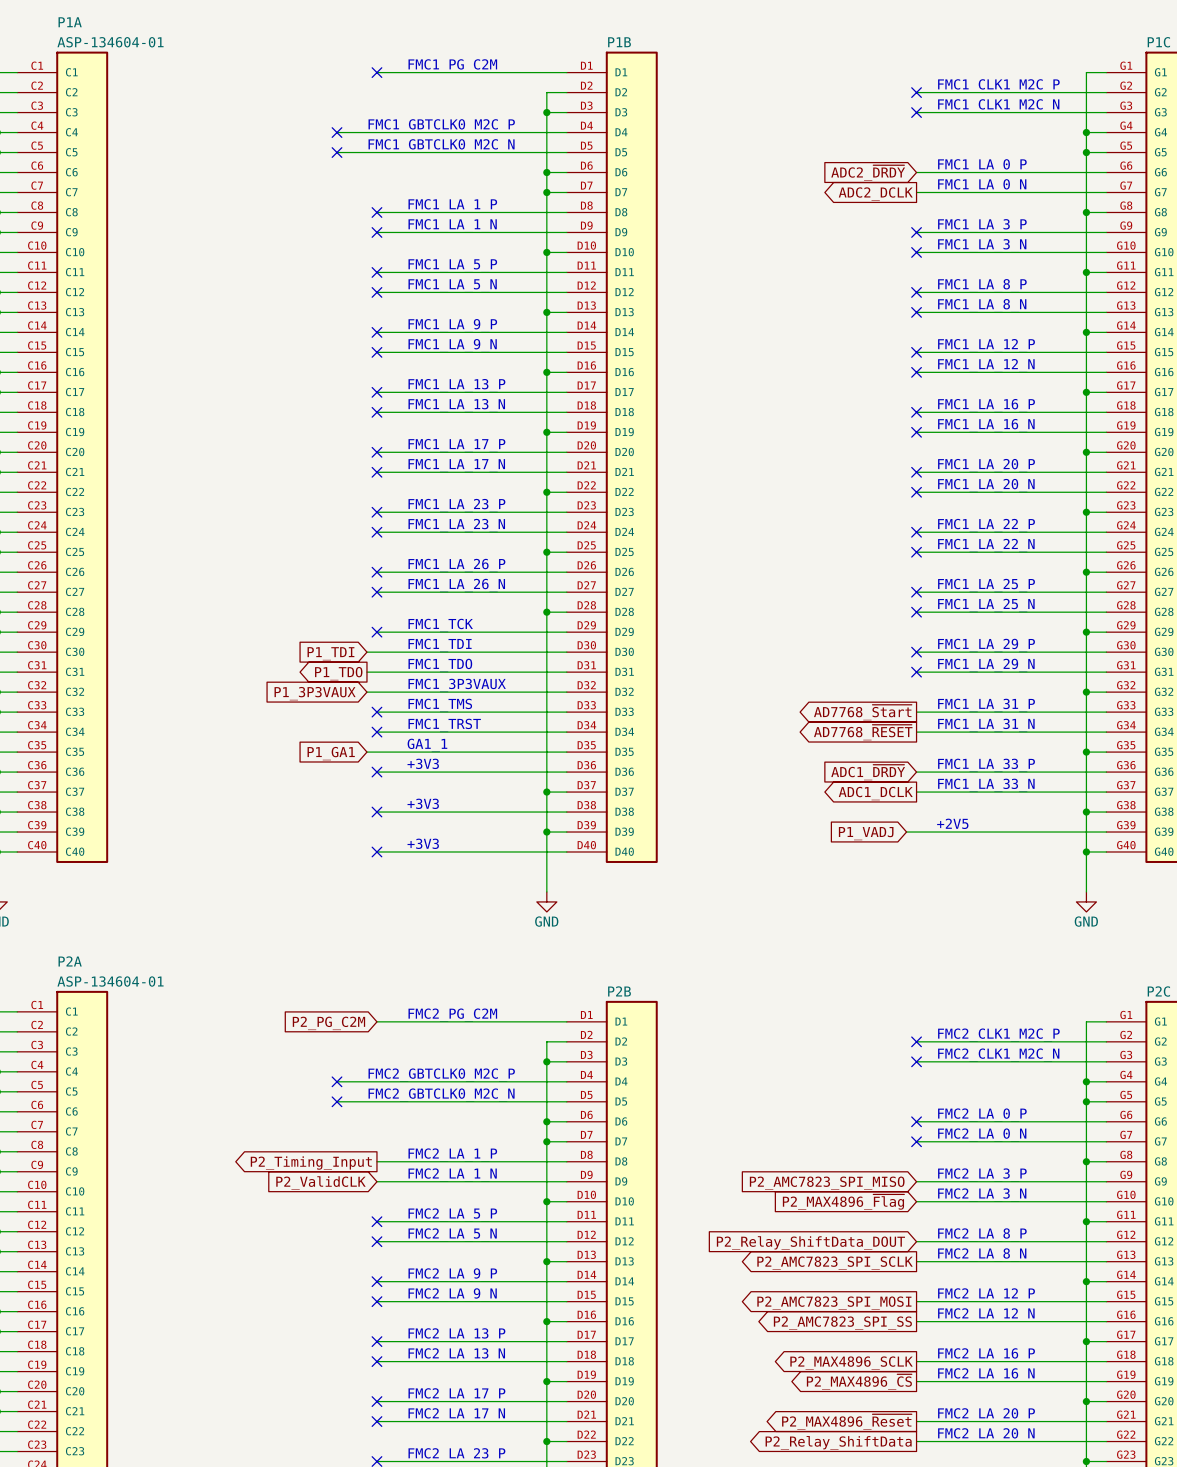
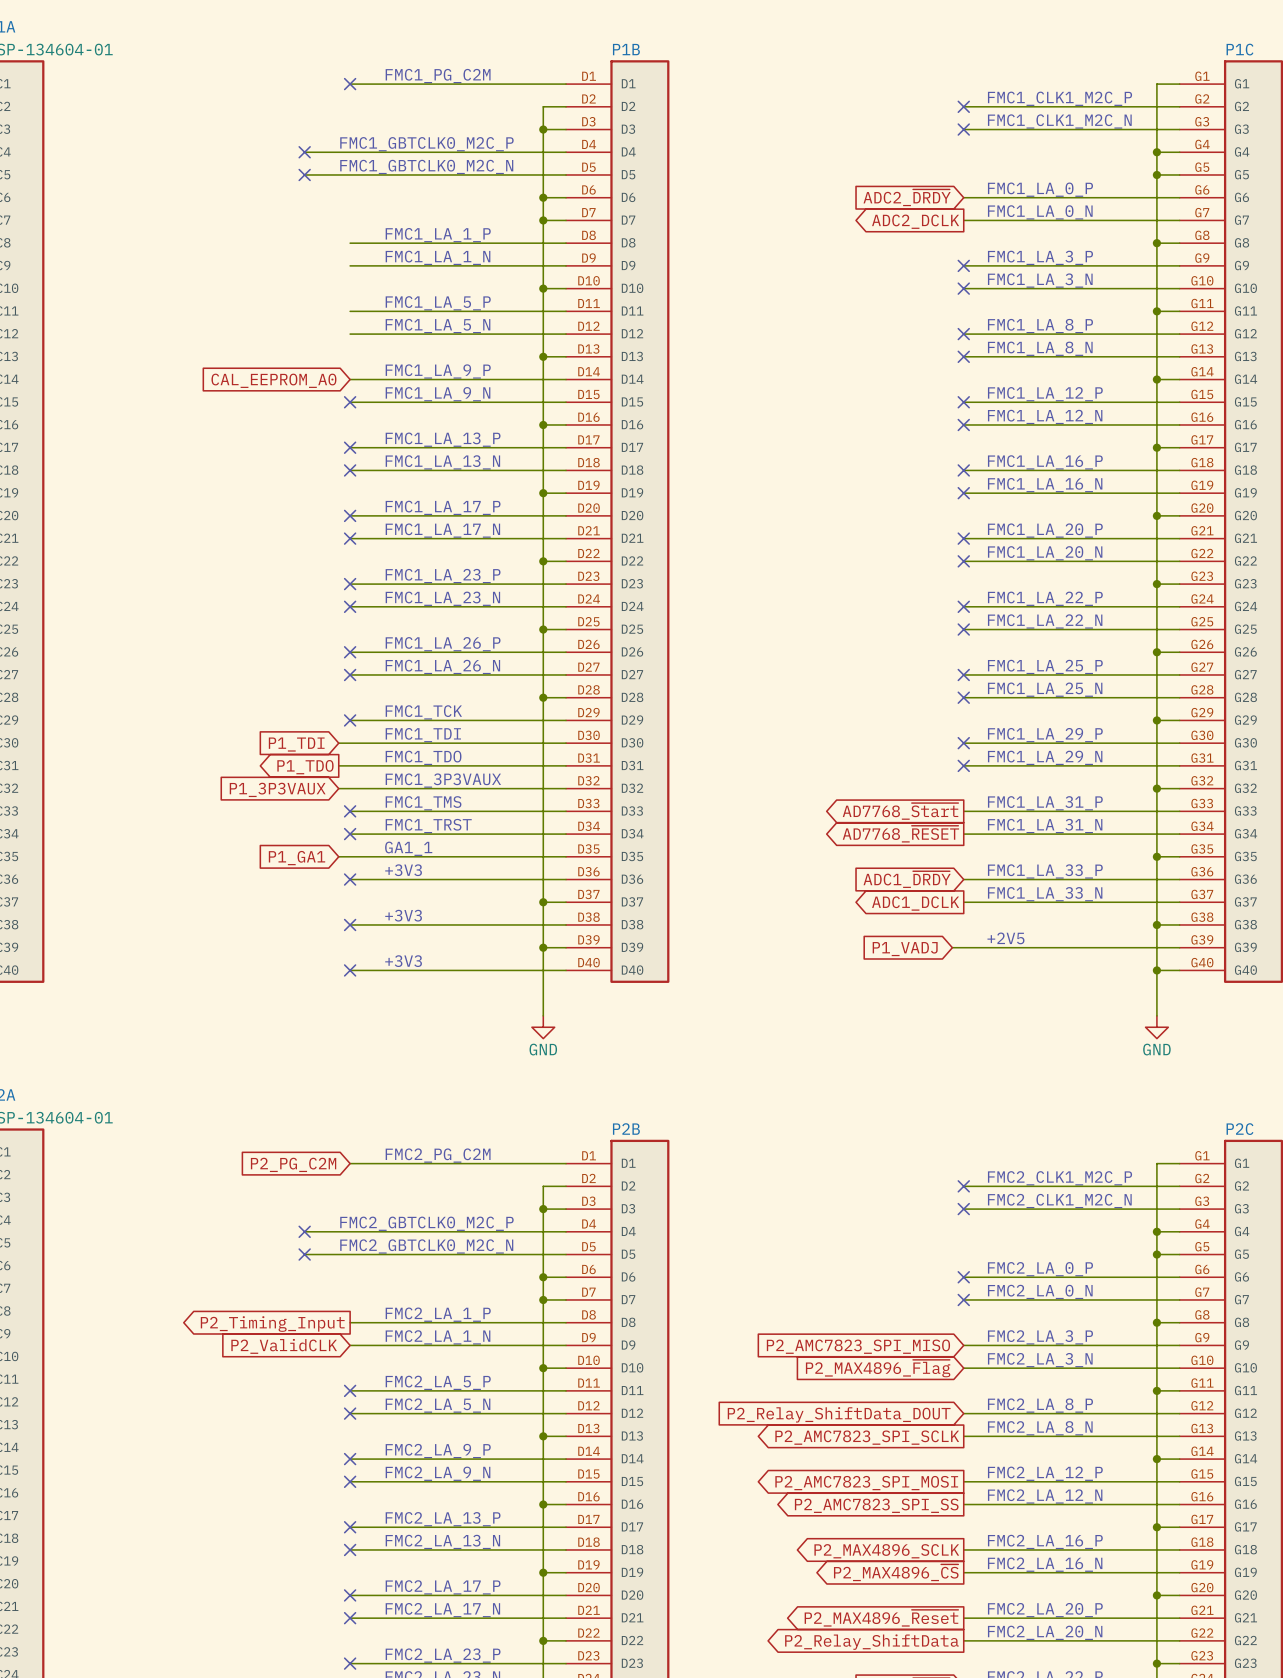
no-connect mark: (376, 212) -> none
no-connect mark: (376, 232) -> none
no-connect mark: (376, 272) -> none
no-connect mark: (376, 292) -> none
no-connect mark: (376, 332) -> none
global label: none -> CAL_EEPROM_A0 (273, 380)

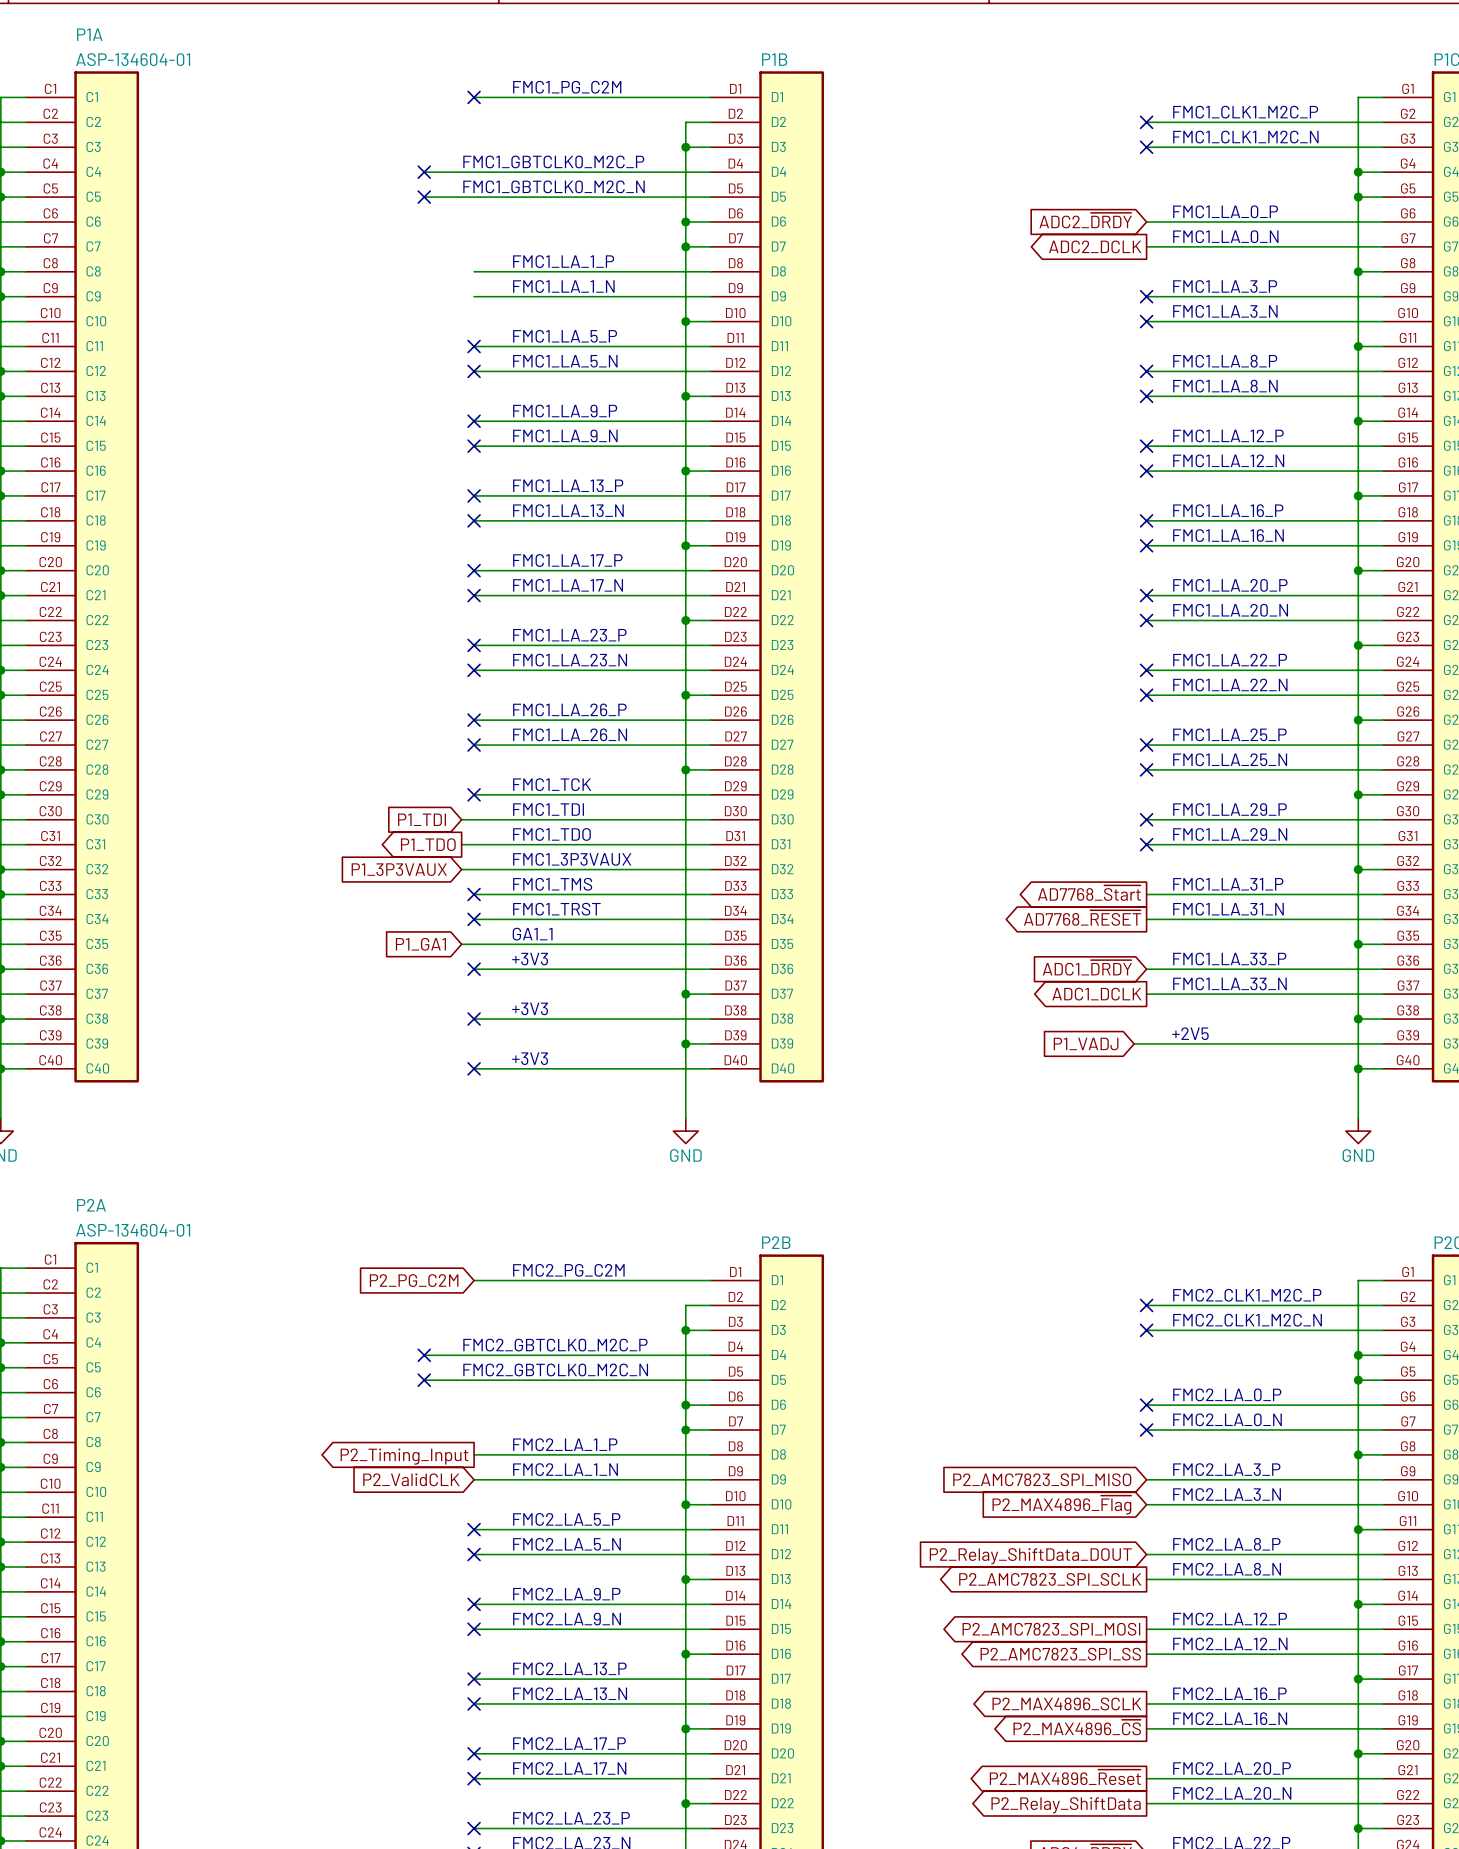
no-connect mark: none -> (474, 346)
no-connect mark: none -> (474, 371)
no-connect mark: none -> (474, 421)
global label: CAL_EEPROM_A0 (273, 380) -> none

